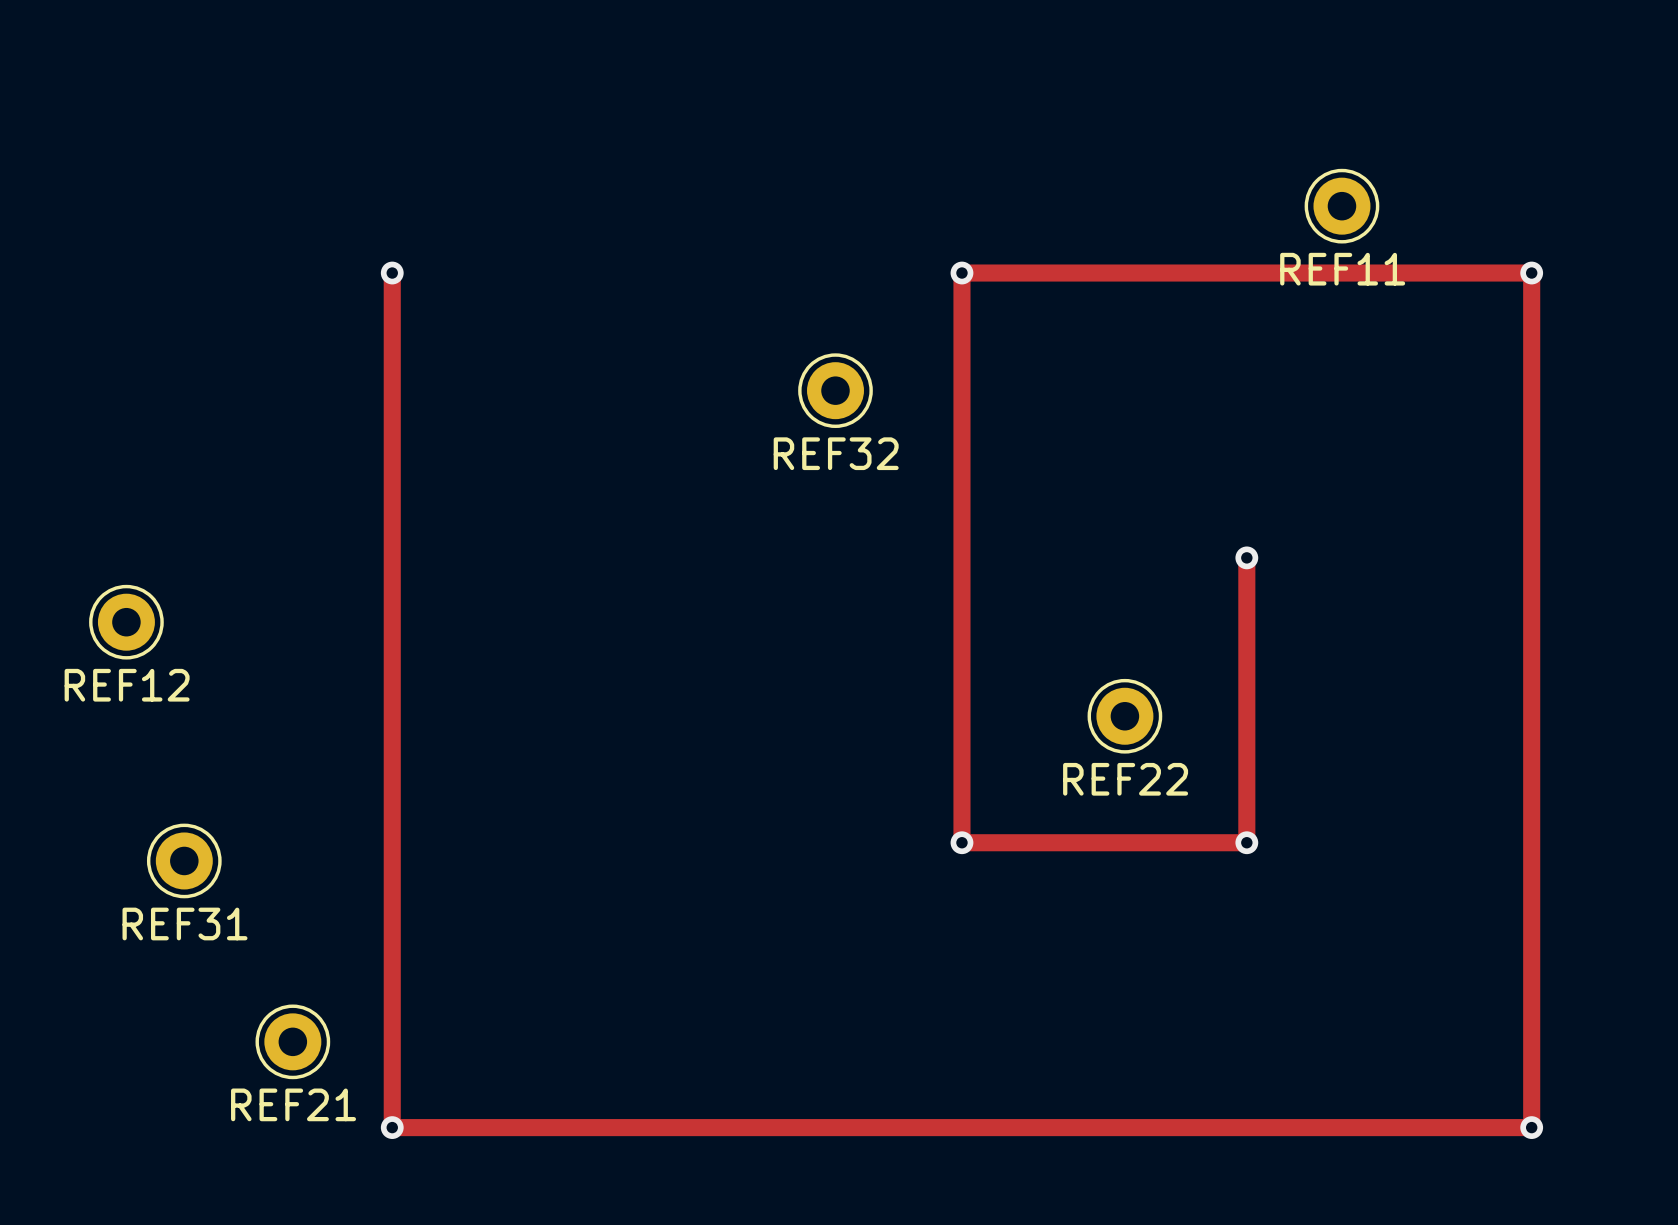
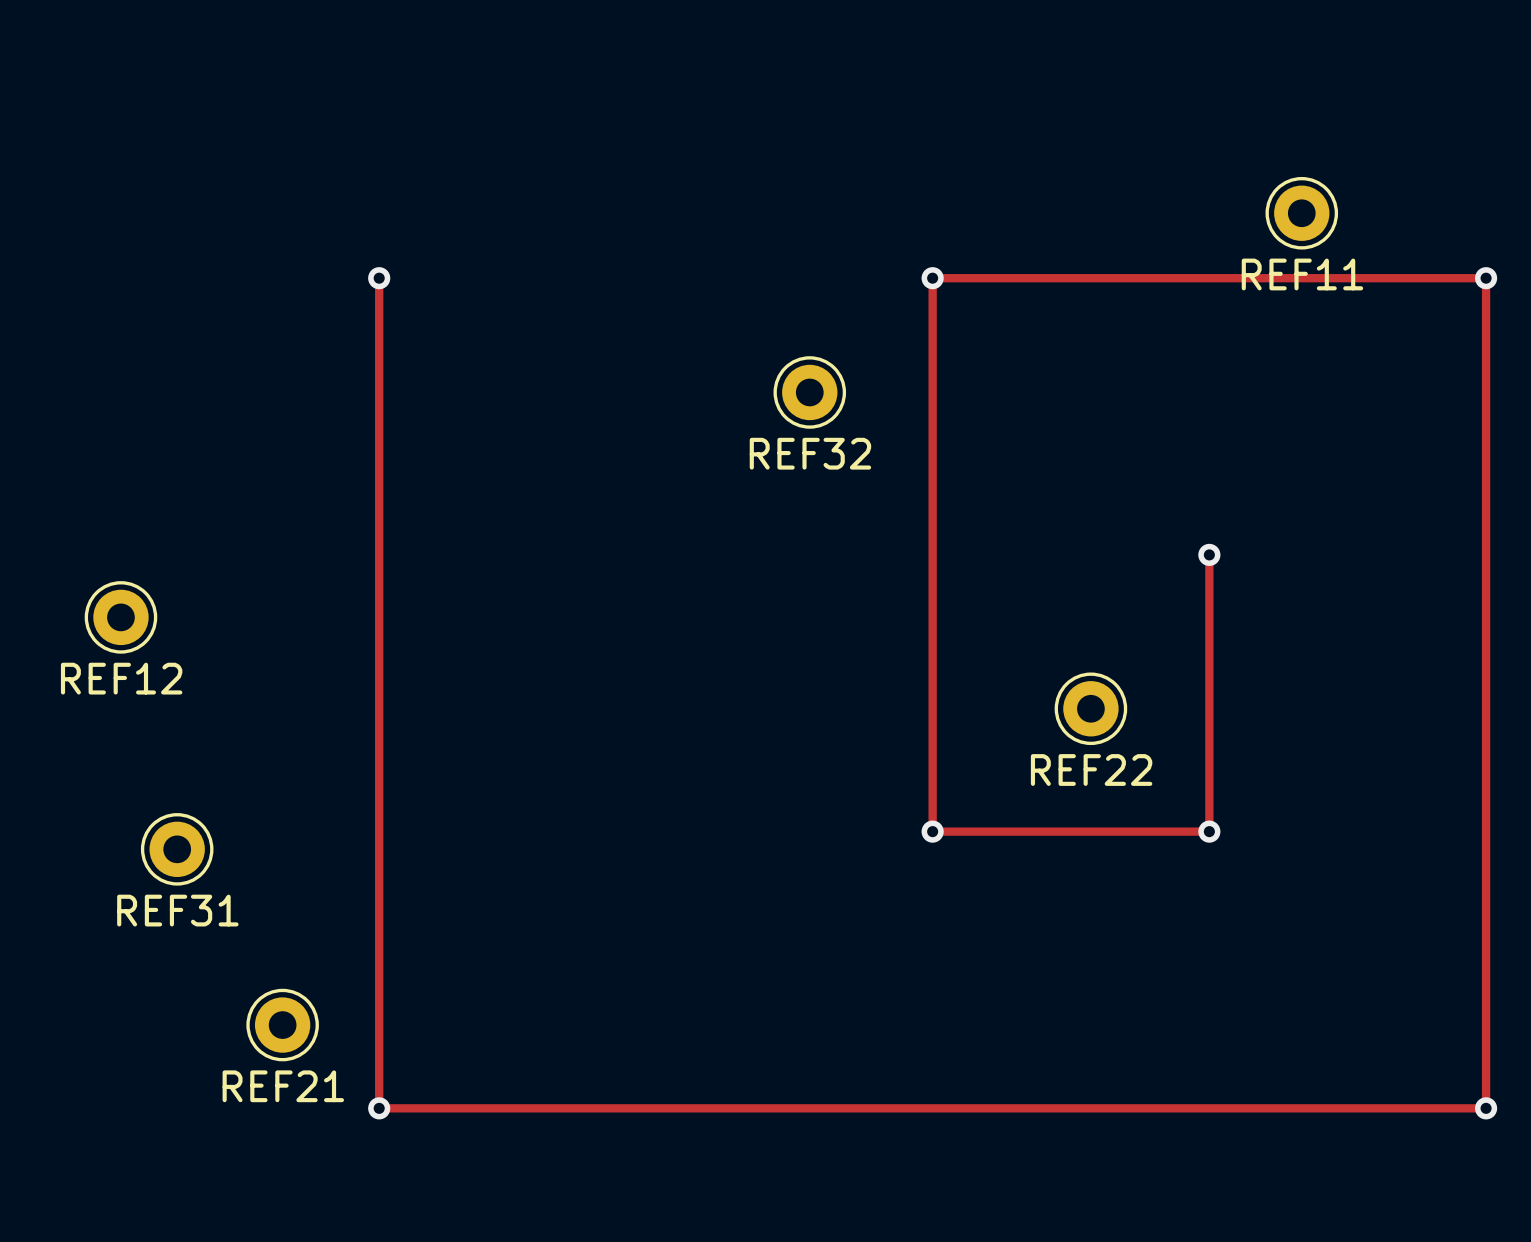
top track width: thick (392, 273) (392, 1127) (1531, 1127) (1531, 273) (961, 273) (961, 842) (1246, 842) (1246, 557) -> thin (379, 278) (379, 1108) (1486, 1108) (1486, 278) (932, 278) (932, 831) (1209, 831) (1209, 554)

